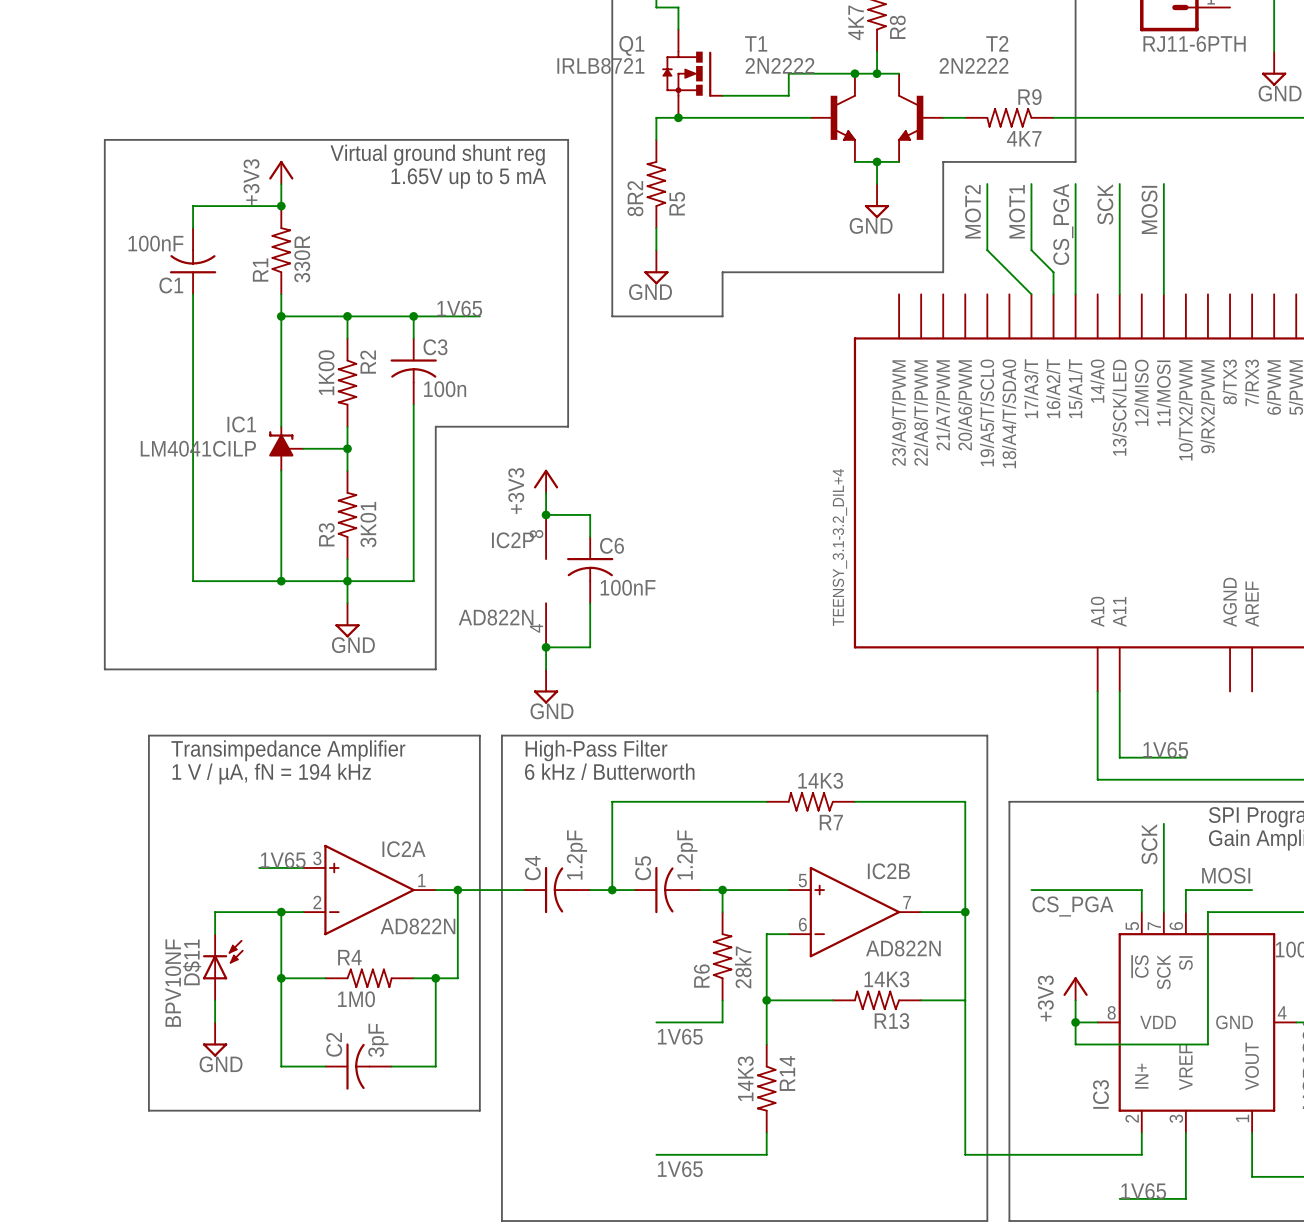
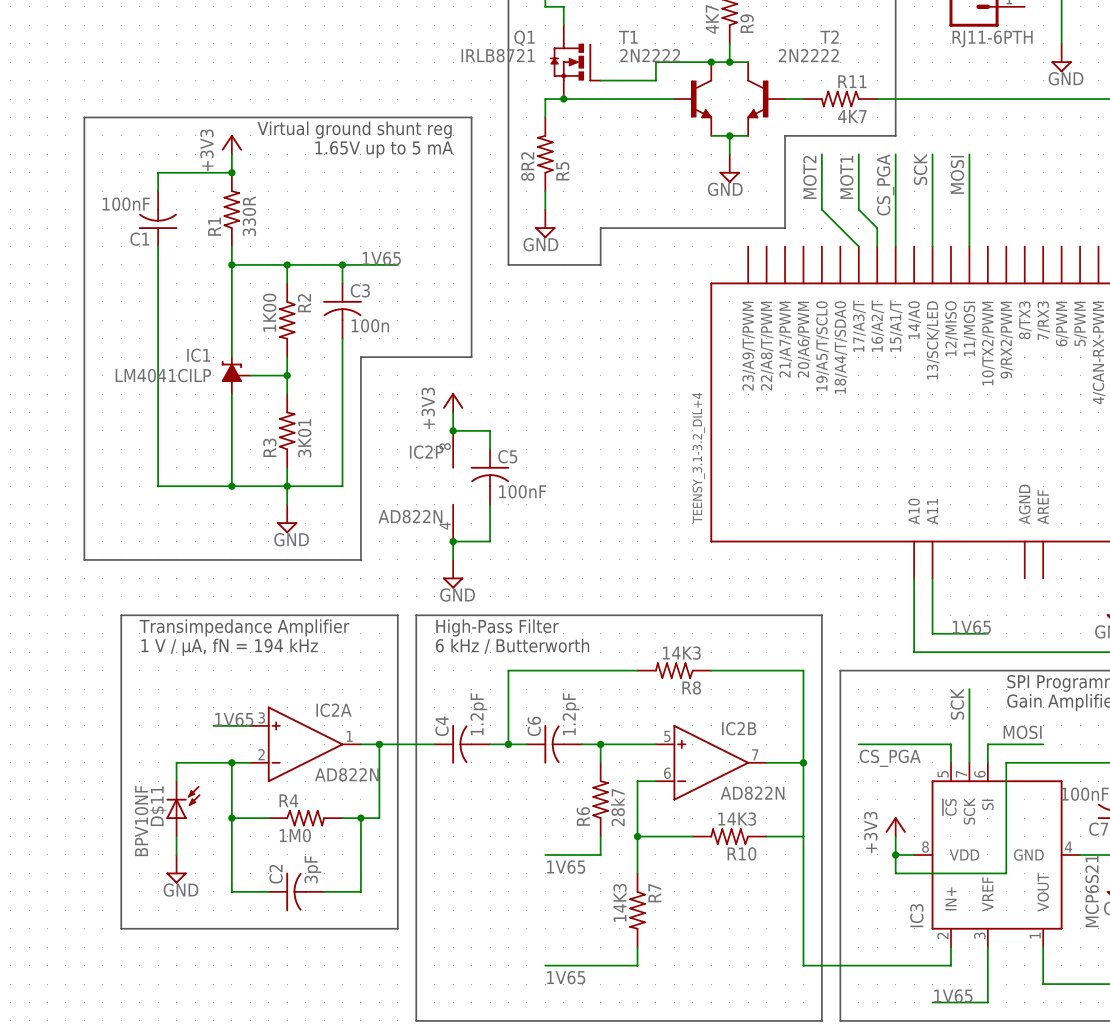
R8 name: R8 (897, 27) -> R9 (747, 23)
R9 name: R9 (1029, 97) -> R11 (852, 81)
C6 name: C6 (612, 545) -> C5 (507, 456)
R7 name: R7 (831, 822) -> R8 (691, 687)
C5 name: C5 (643, 868) -> C6 (534, 726)
R13 name: R13 (891, 1021) -> R10 (741, 853)
R14 name: R14 (787, 1073) -> R7 (654, 893)

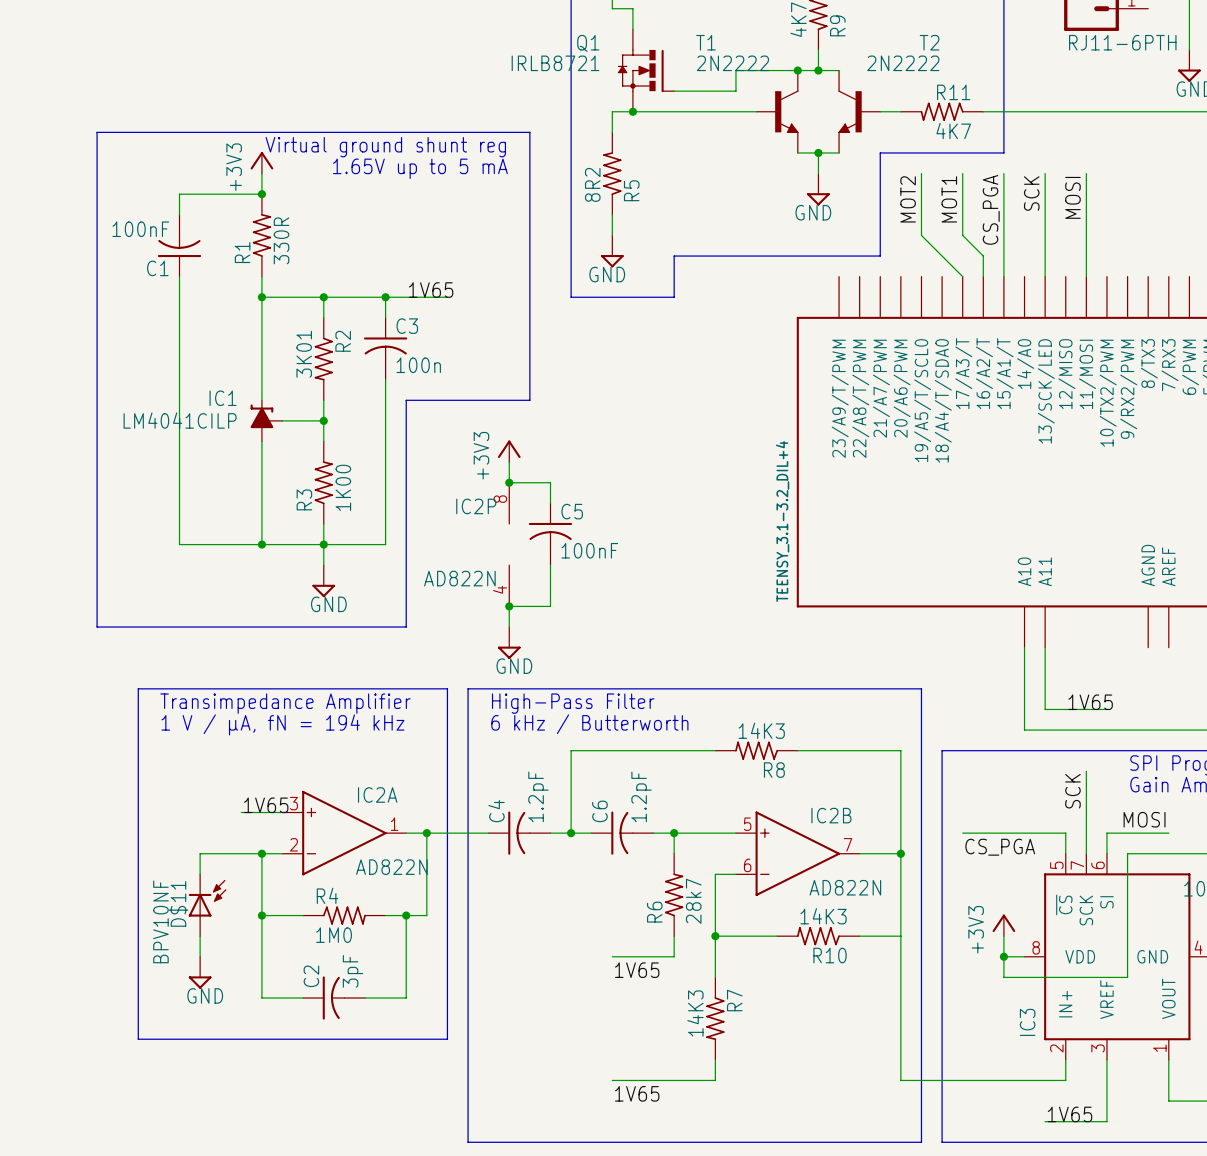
R2 value: 1K00 (269, 312) -> 3K01 (304, 354)
R3 value: 3K01 (304, 438) -> 1K00 (343, 487)

